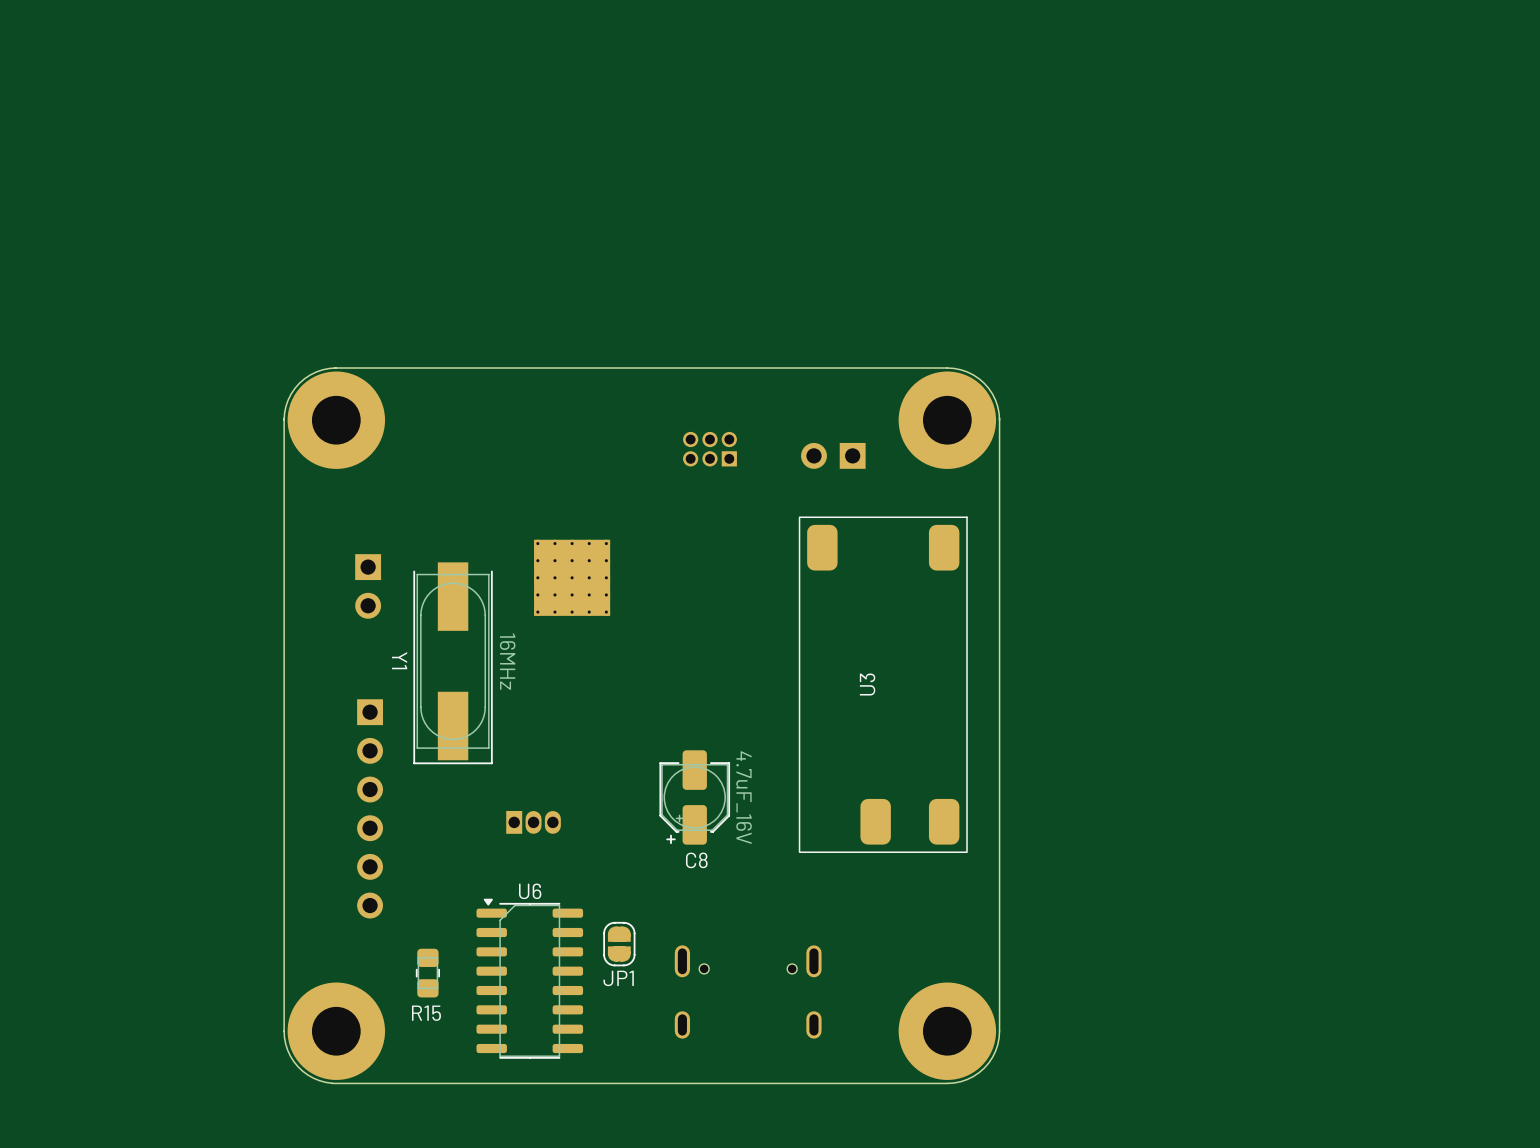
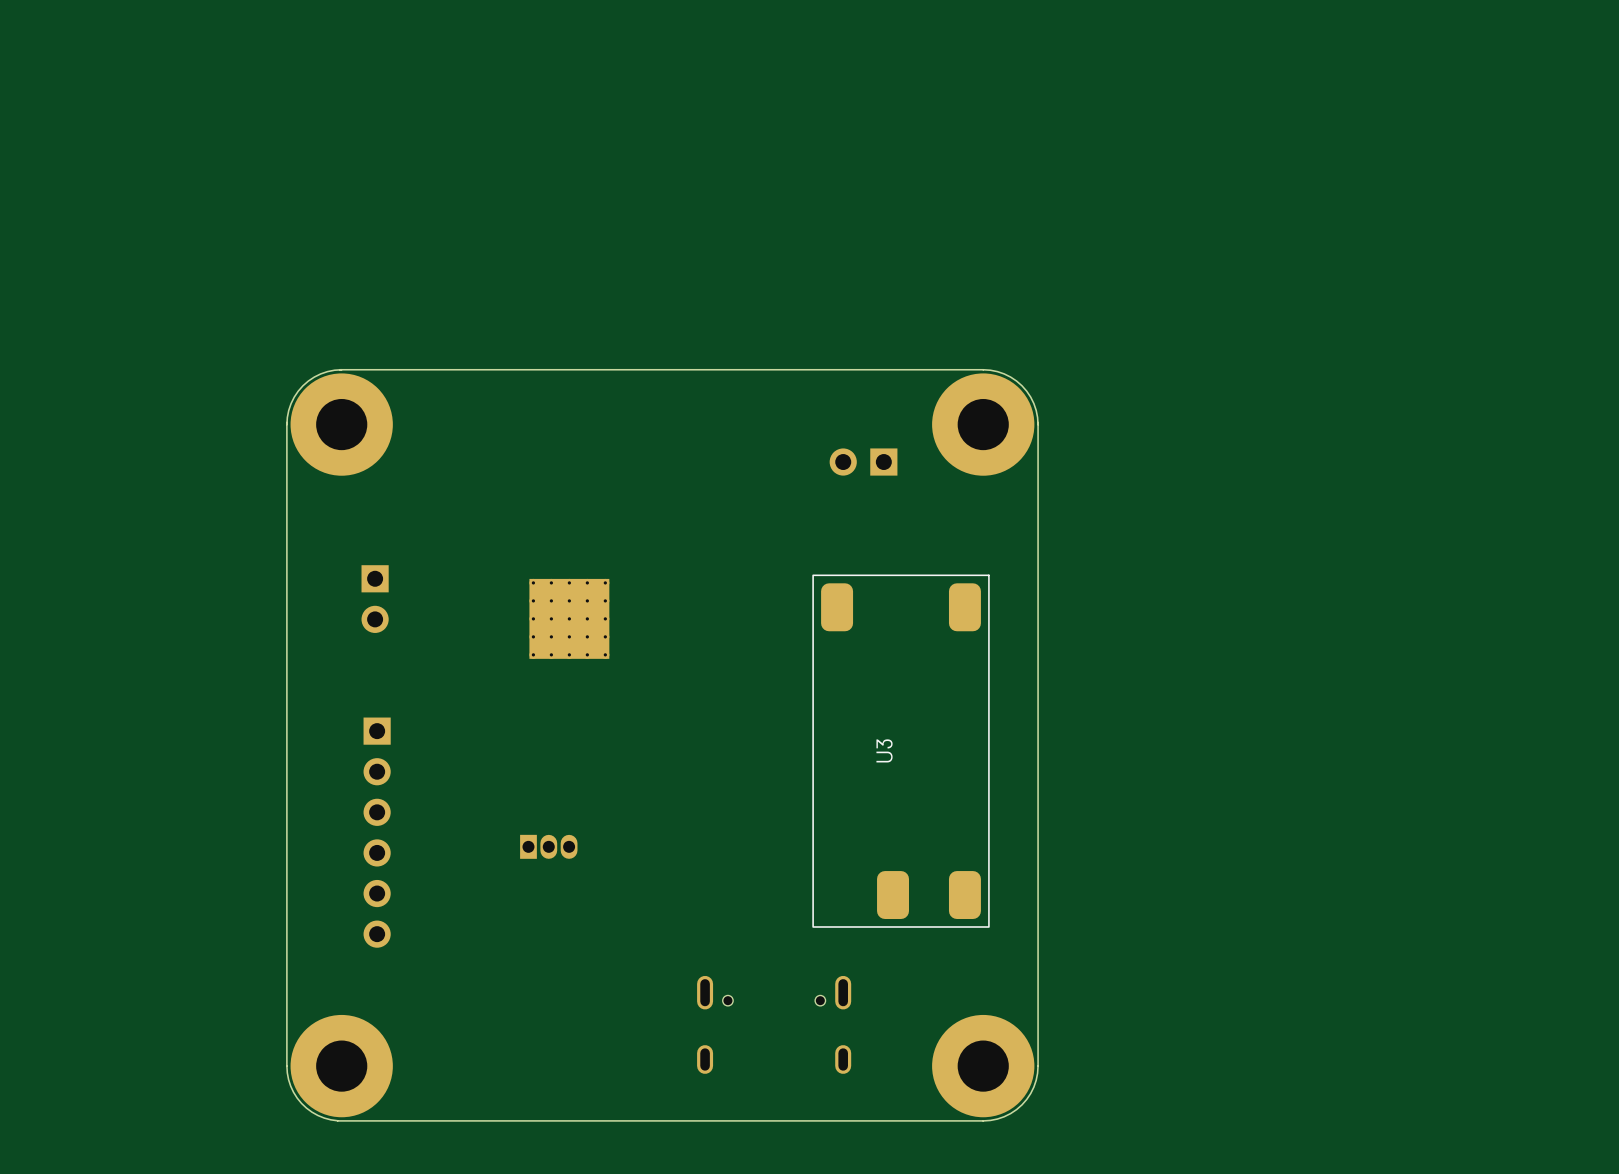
part: (709, 449) -> none
part position: (572, 577) -> (569, 618)
Y1: 16MHz (453, 663) -> none
U3 position: (883, 684) -> (901, 751)
C8: 4.7uF_16V (694, 797) -> none
JP1: (619, 944) -> none
R15: (427, 973) -> none
U6: (529, 978) -> none

